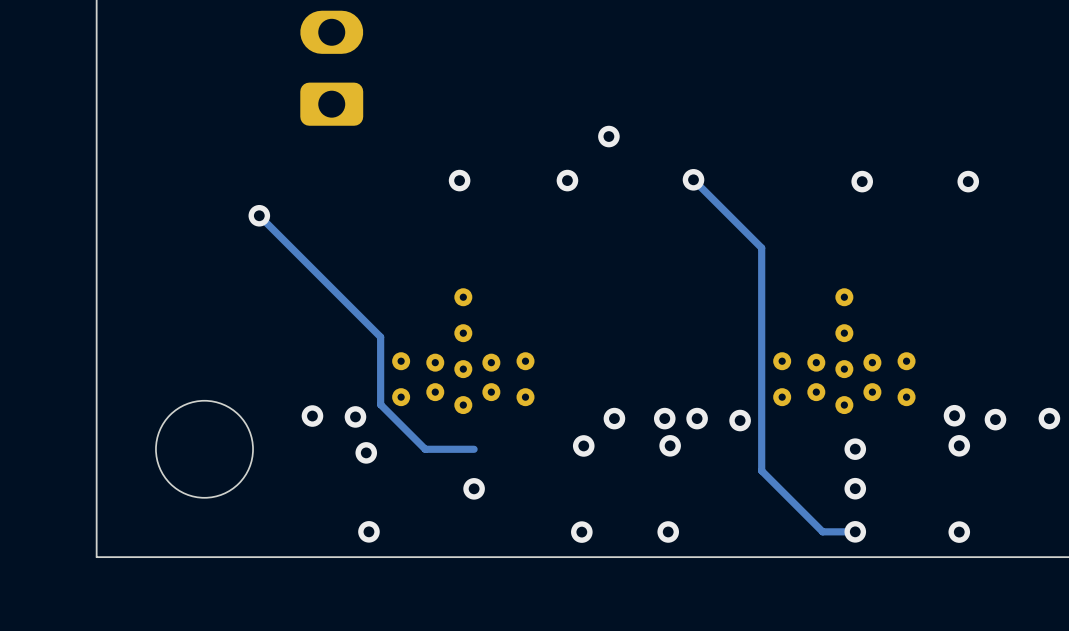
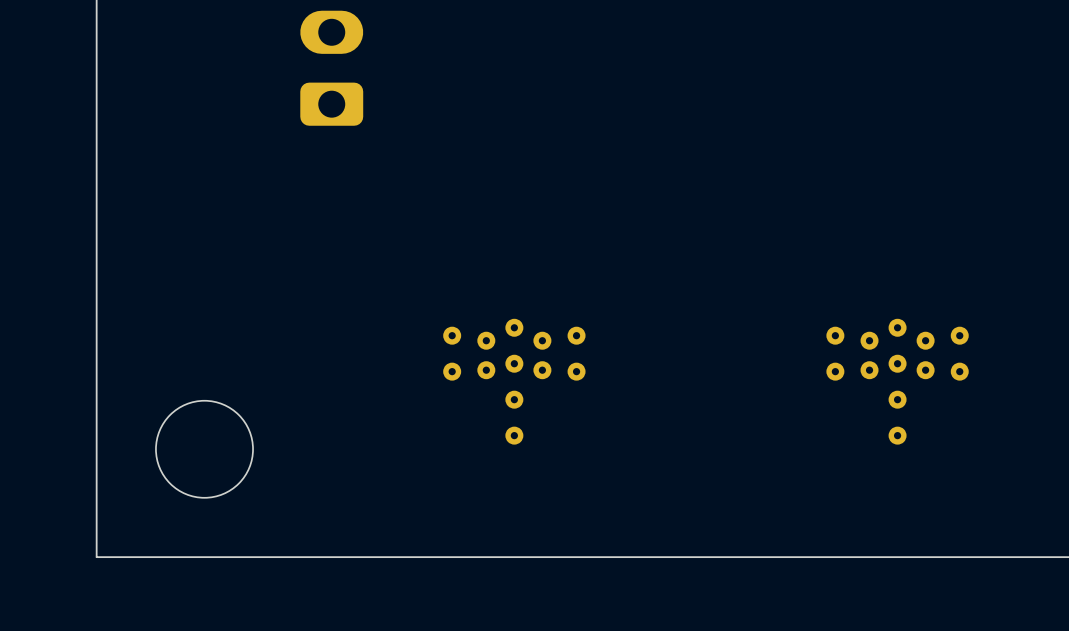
via: (608, 136) -> none
track: (693, 179) (761, 247) (761, 470) (822, 531) (855, 531) -> none
via: (693, 179) -> none
via: (459, 180) -> none
via: (567, 180) -> none
via: (862, 181) -> none
via: (968, 181) -> none
track: (259, 215) (380, 337) (380, 404) (425, 449) (474, 449) -> none
via: (259, 215) -> none
part rotation: 0° (463, 351) -> 180° (514, 381)
part rotation: 0° (844, 351) -> 180° (897, 381)
via: (954, 415) -> none
via: (312, 416) -> none
via: (355, 416) -> none
via: (614, 418) -> none
via: (664, 418) -> none
via: (697, 418) -> none
via: (1049, 418) -> none
via: (995, 419) -> none
via: (740, 420) -> none
via: (583, 445) -> none
via: (670, 445) -> none
via: (959, 445) -> none
via: (855, 449) -> none
via: (366, 452) -> none
via: (474, 488) -> none
via: (855, 488) -> none
via: (368, 531) -> none
via: (668, 531) -> none
via: (855, 531) -> none
via: (581, 532) -> none
via: (959, 532) -> none

